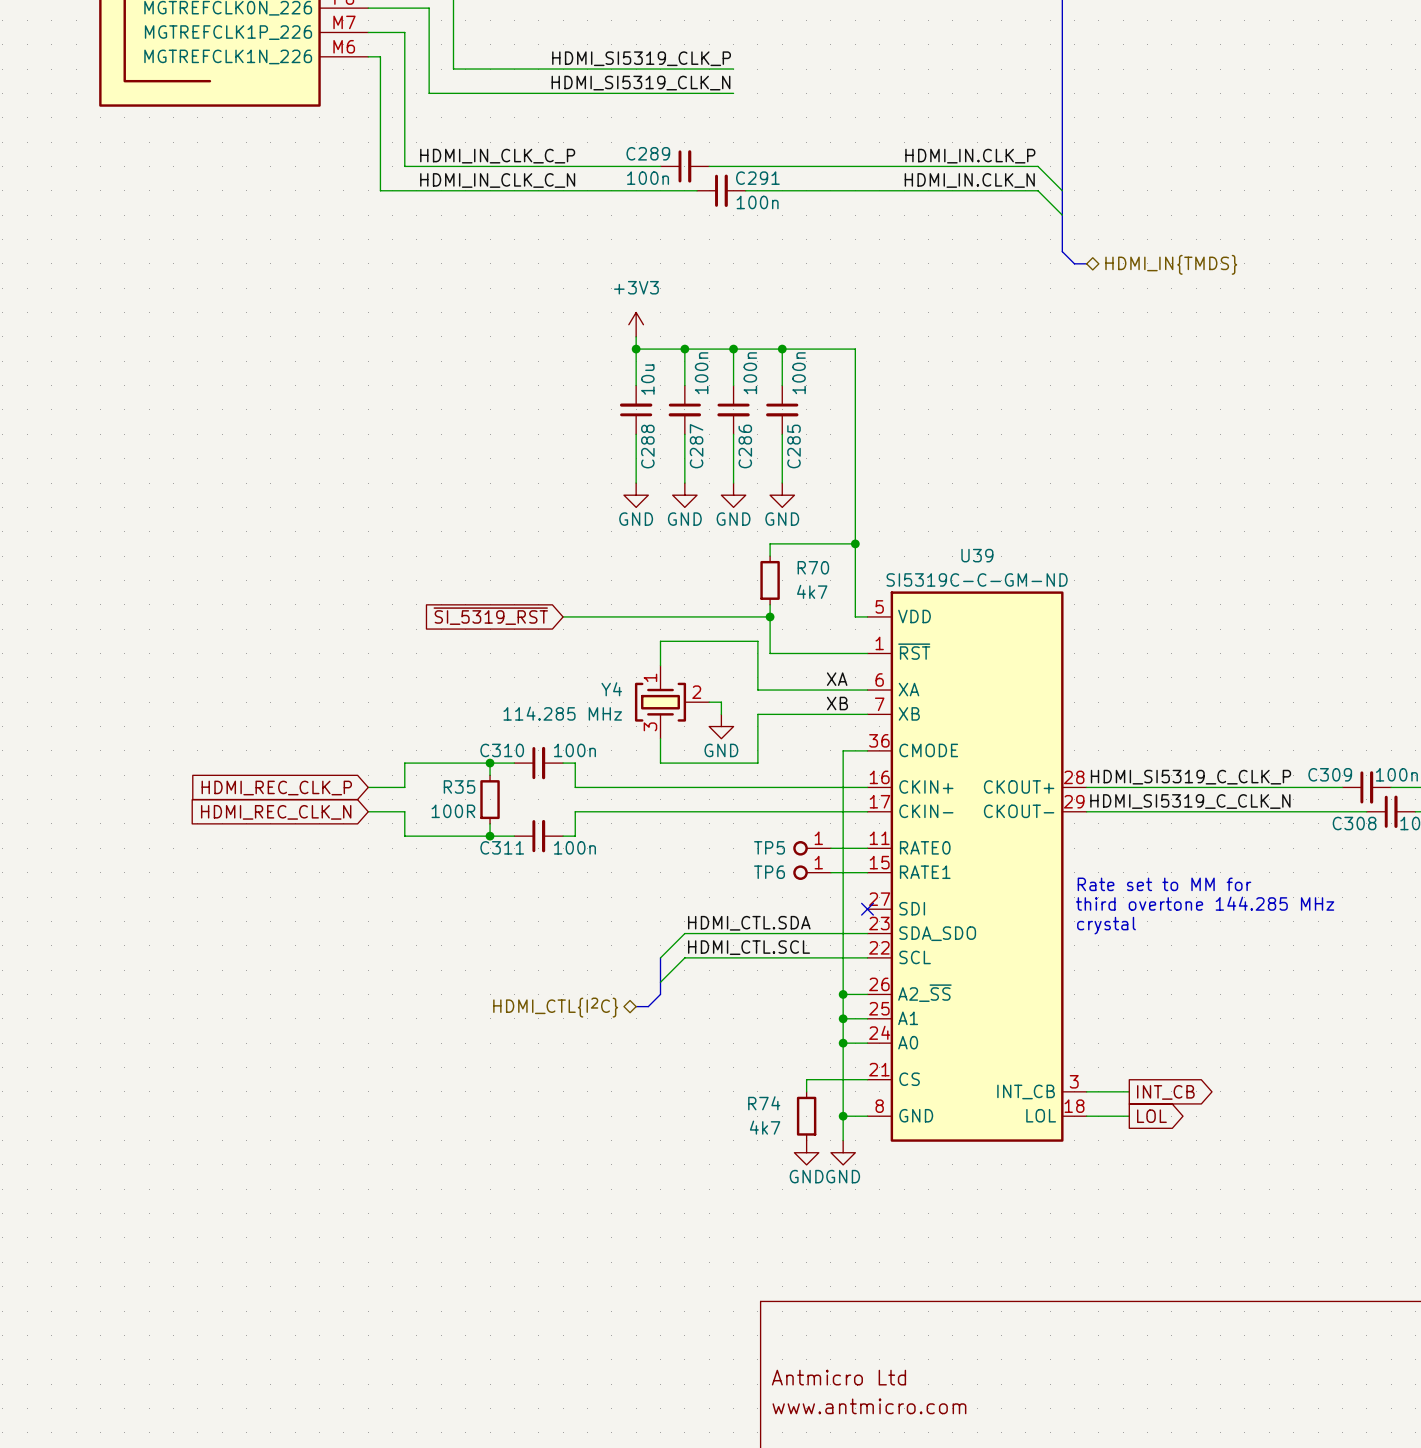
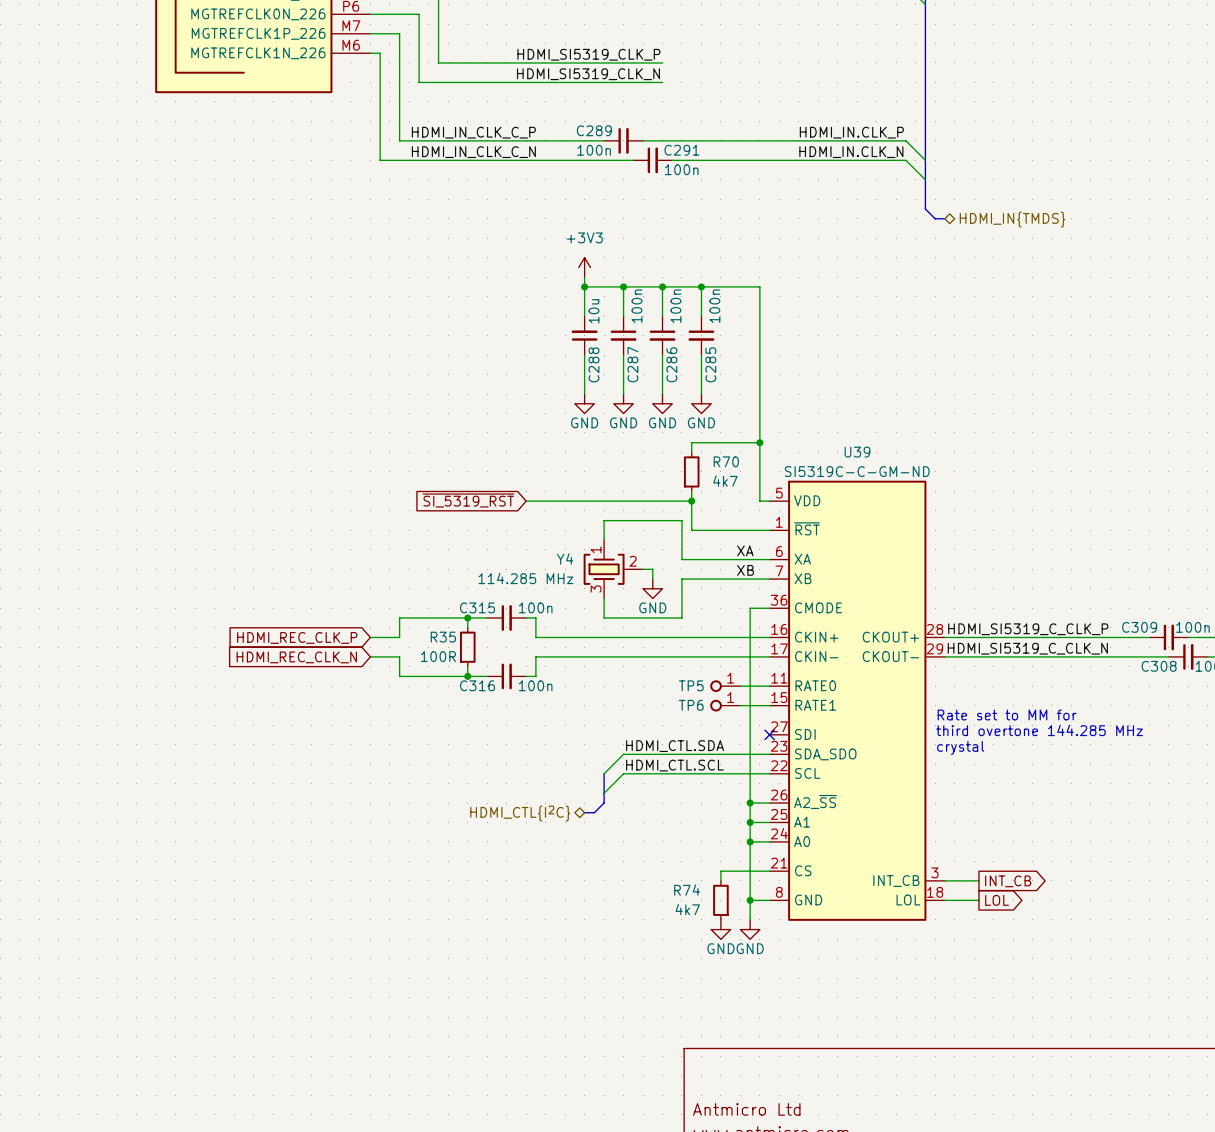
C310 name: C310 (502, 750) -> C315 (477, 607)
C311 name: C311 (502, 847) -> C316 (477, 685)

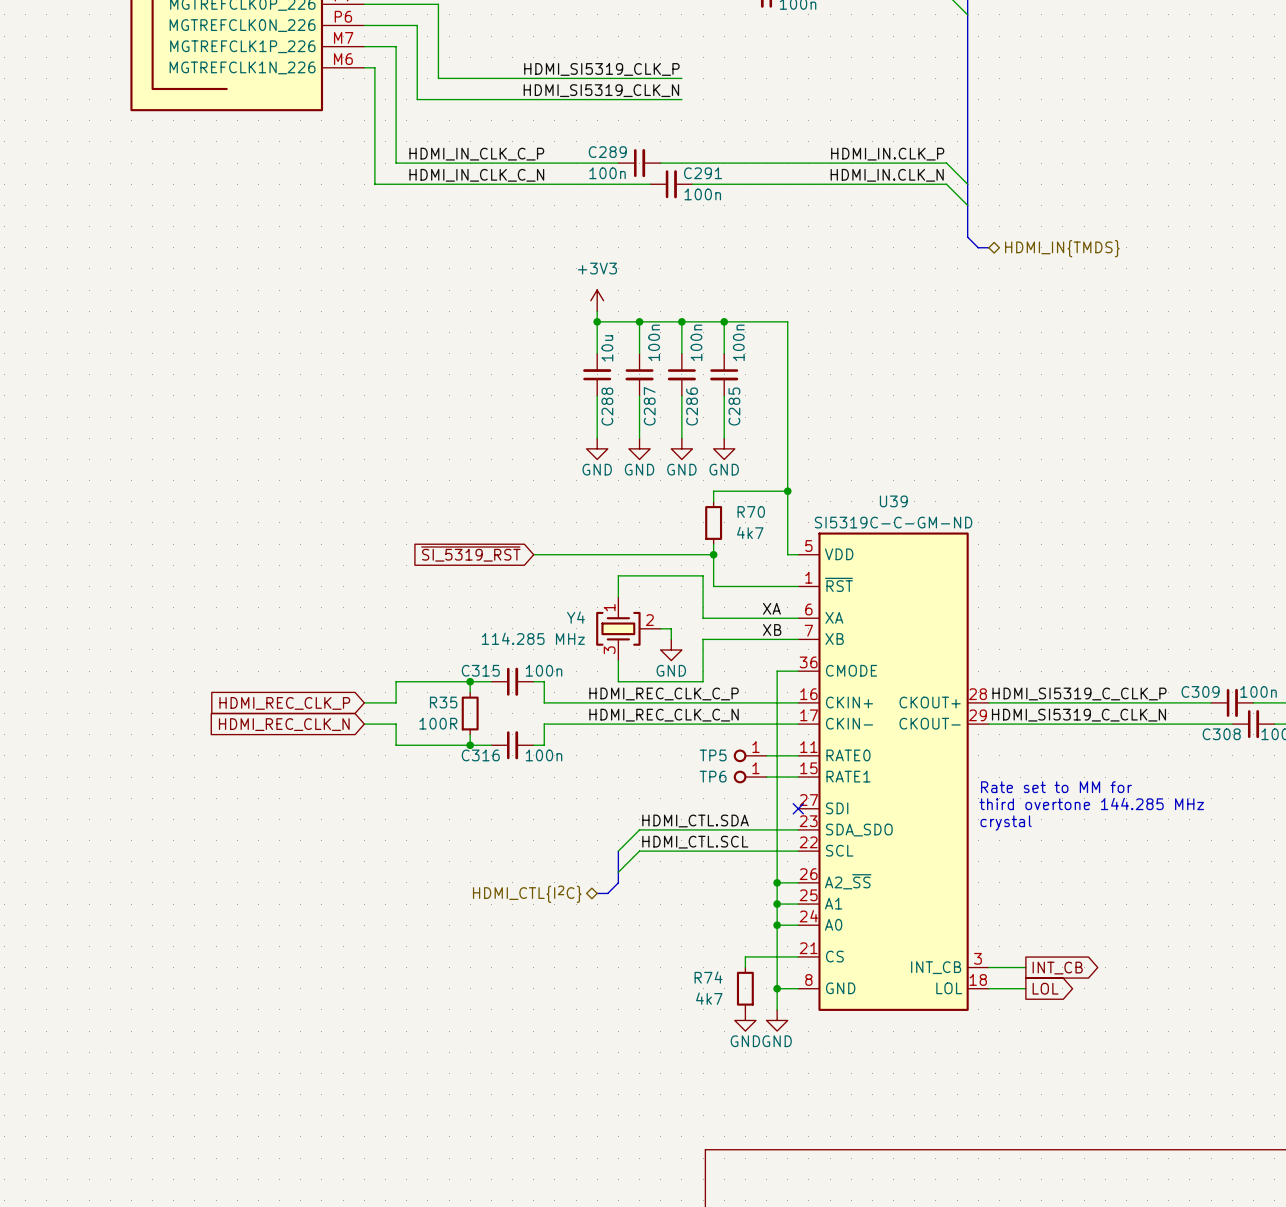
label: none -> HDMI_REC_CLK_C_P (664, 693)
label: none -> HDMI_REC_CLK_C_N (664, 715)

